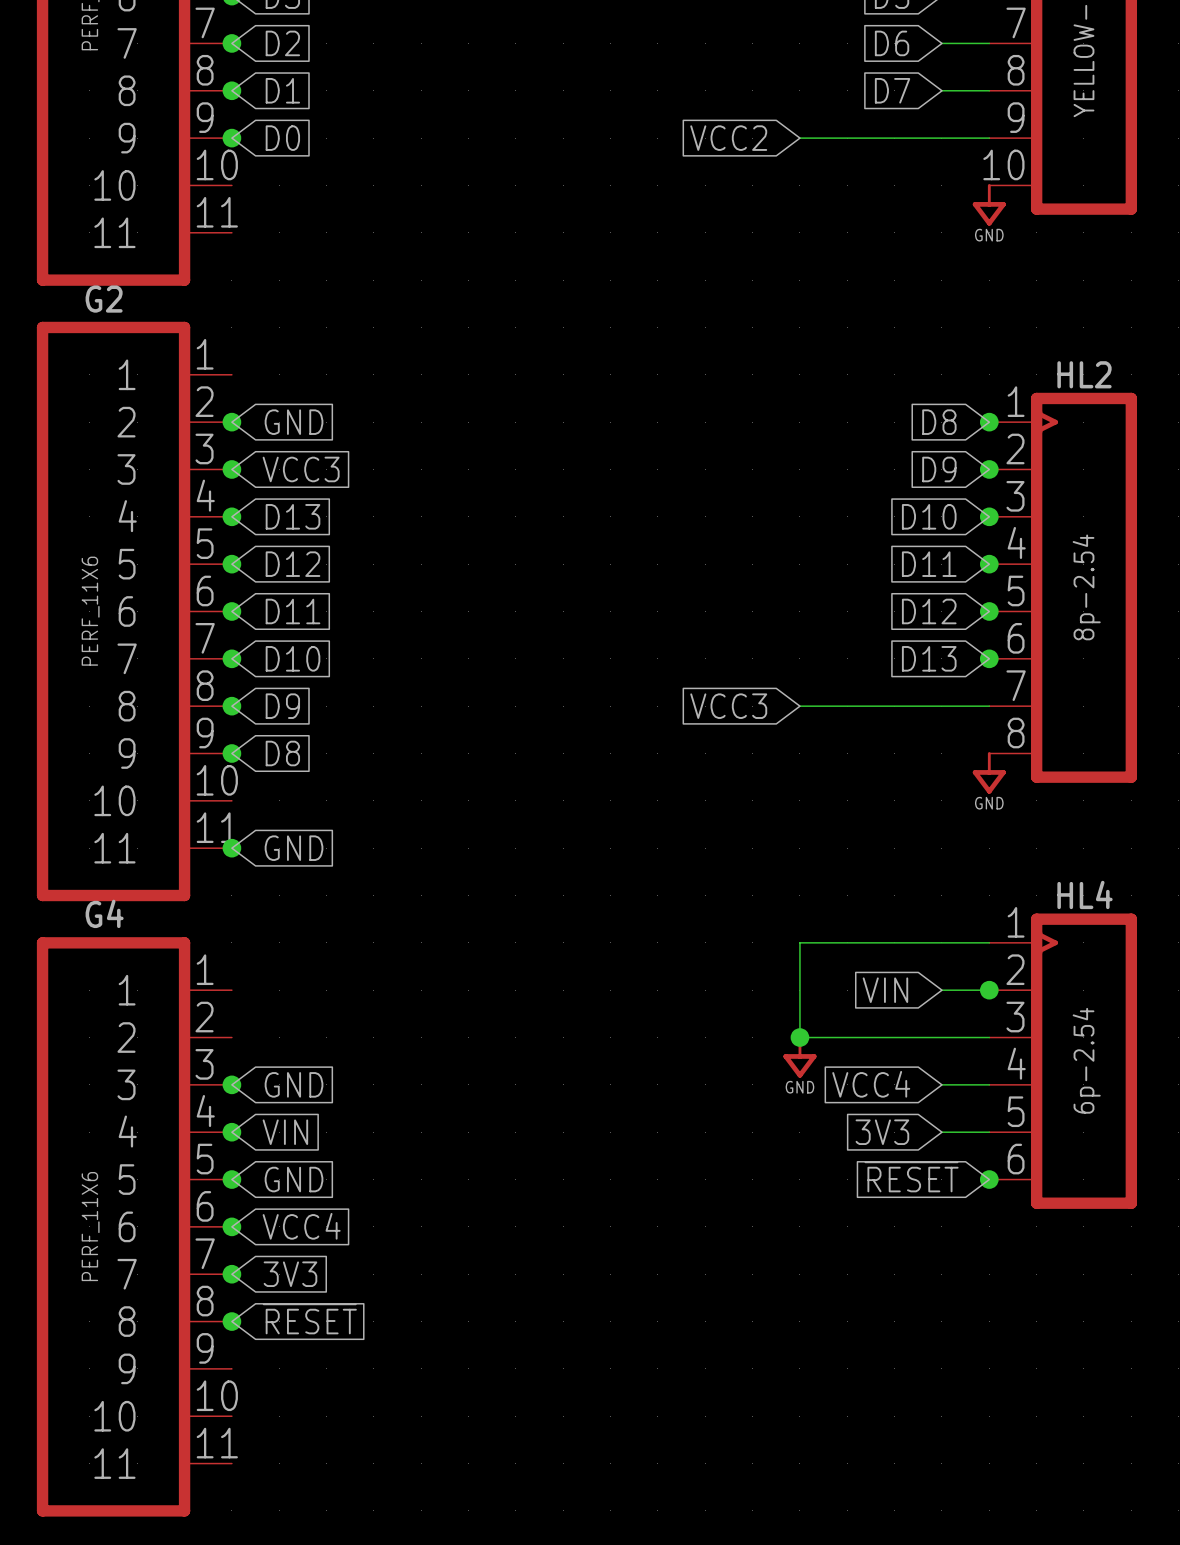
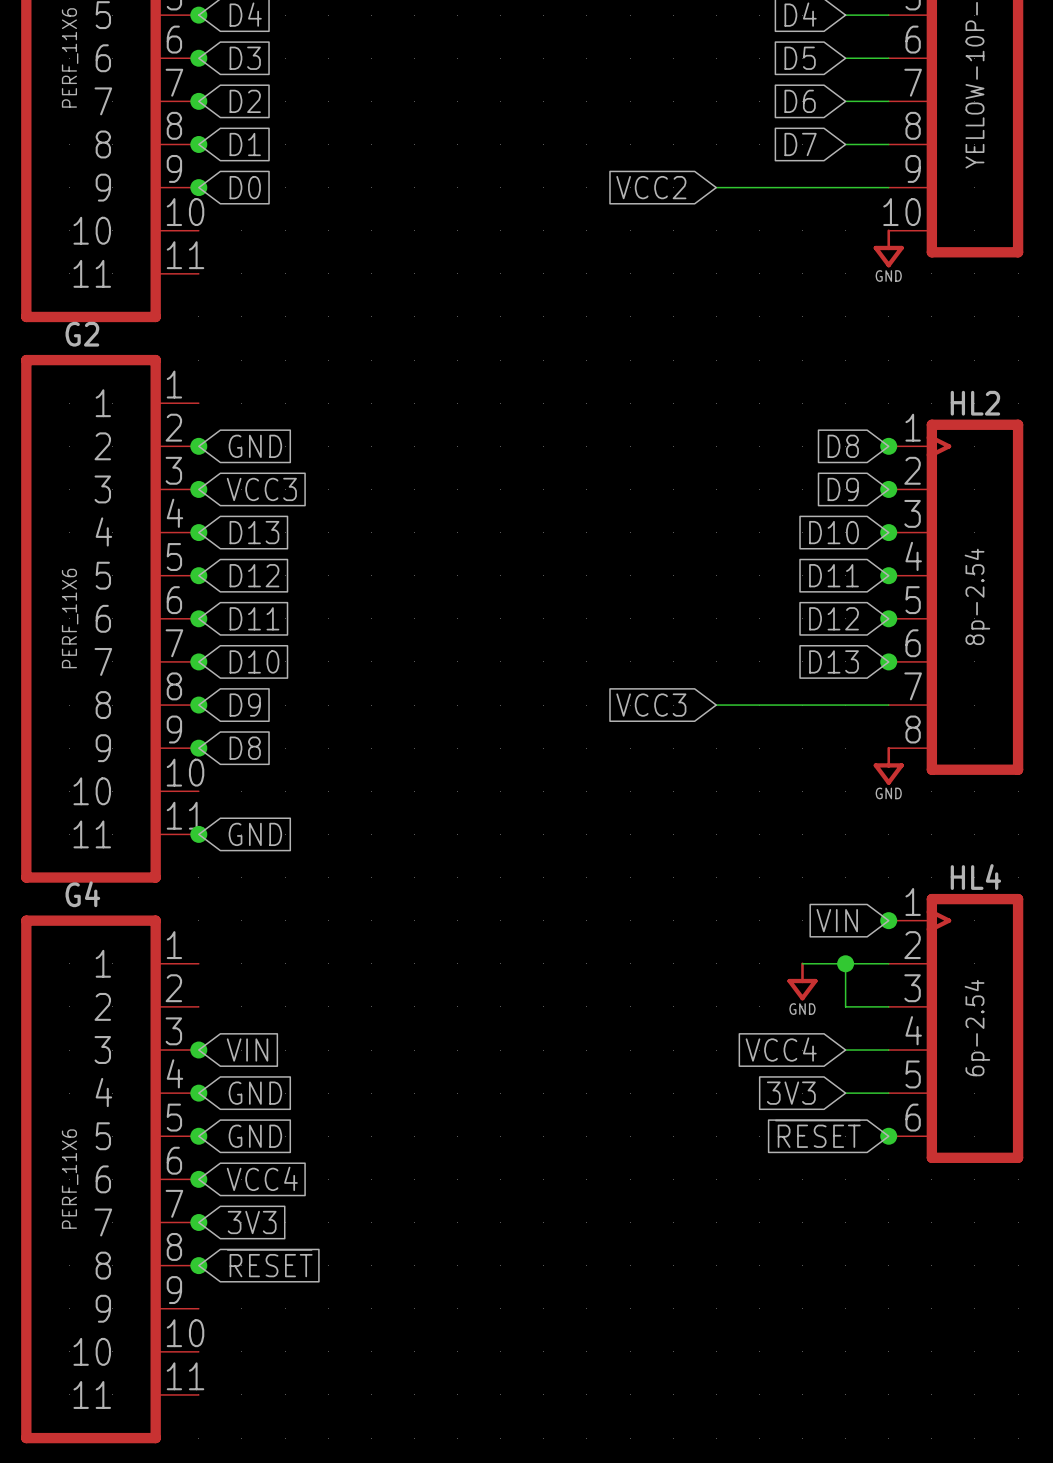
wire: (989, 942) (799, 942) (799, 1037) (941, 1037) -> (802, 963) (845, 963) (845, 1006)
junction: none -> (888, 920)
global label position: VIN (885, 990) -> VIN (837, 920)
junction: none -> (845, 963)
junction: (989, 990) -> none
junction: (799, 1037) -> none
power symbol position: GND (799, 1056) -> GND (802, 981)
global label: GND (294, 1084) -> VIN (247, 1050)
global label: VIN (285, 1132) -> GND (255, 1093)

